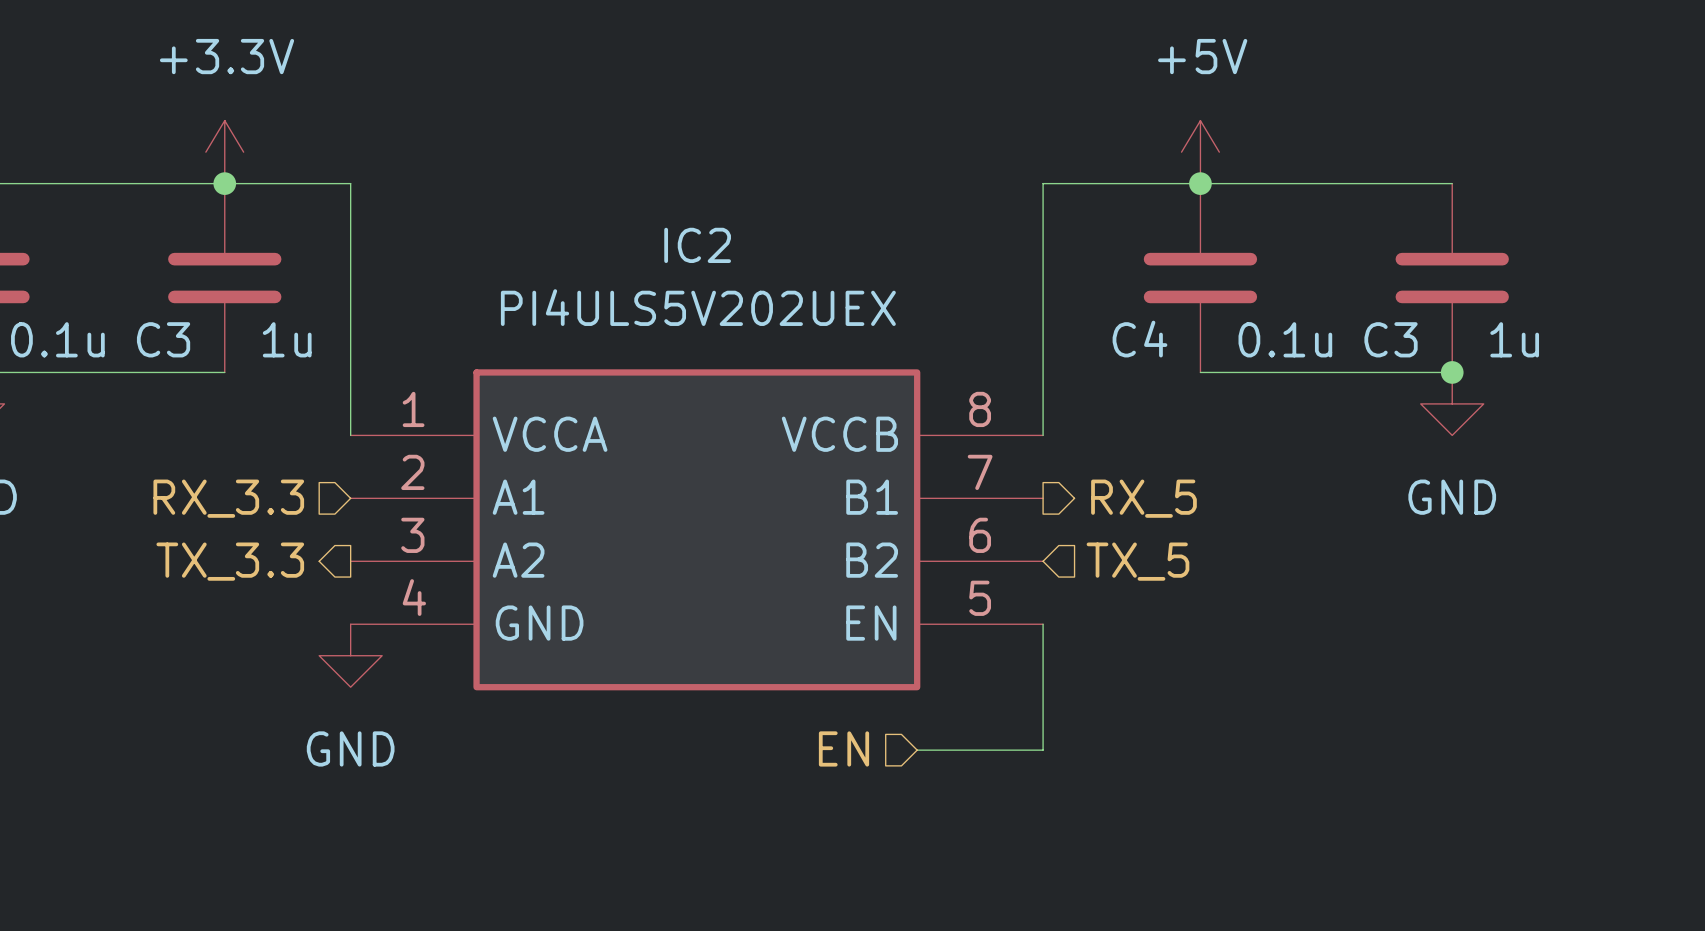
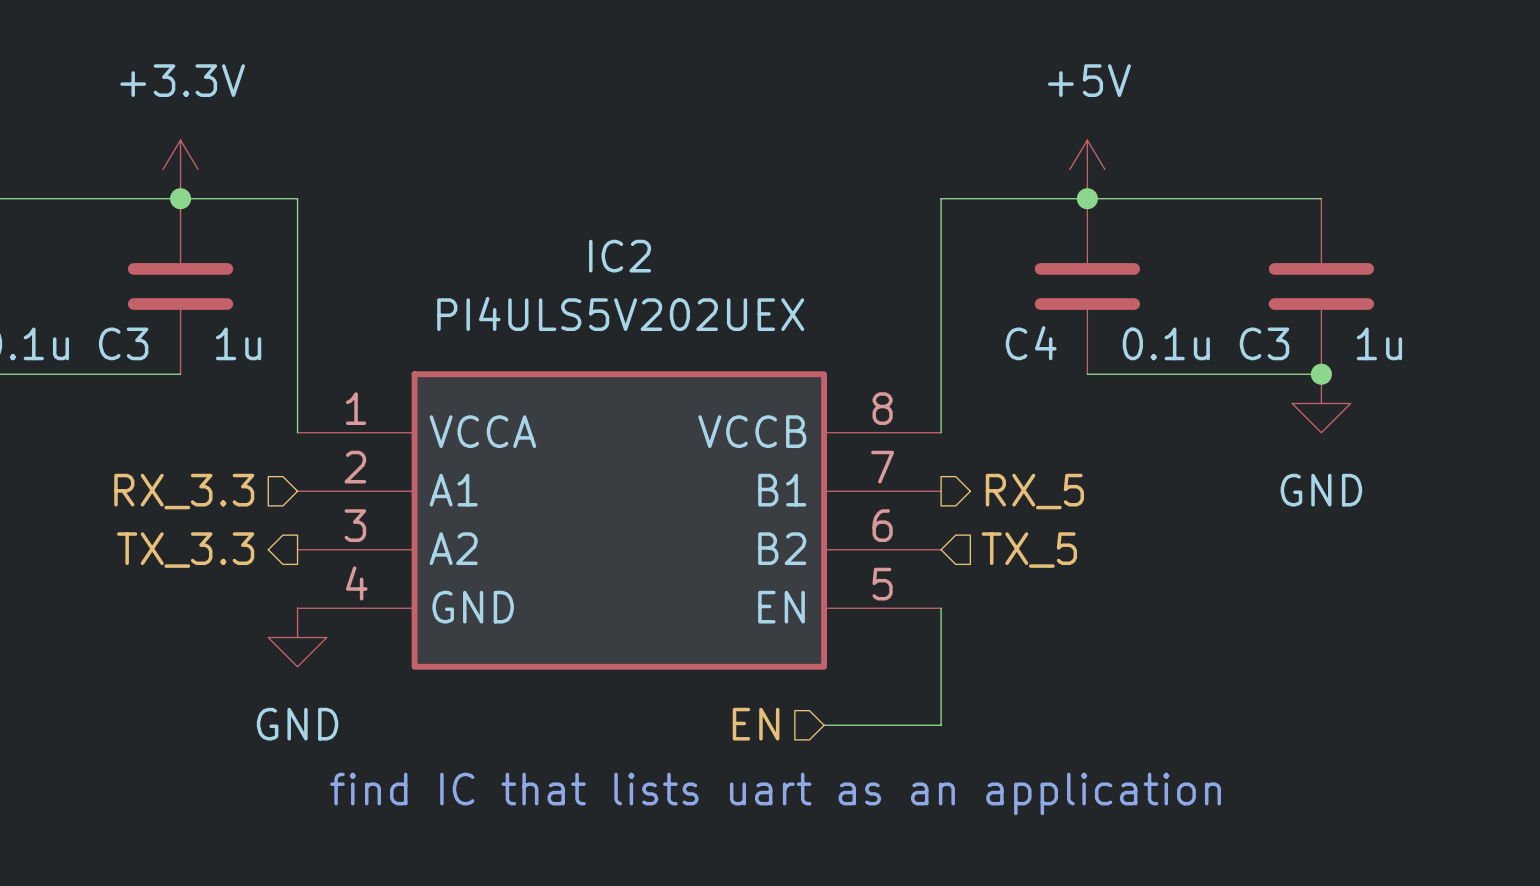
text: none -> find IC that lists uart as an application (775, 793)

